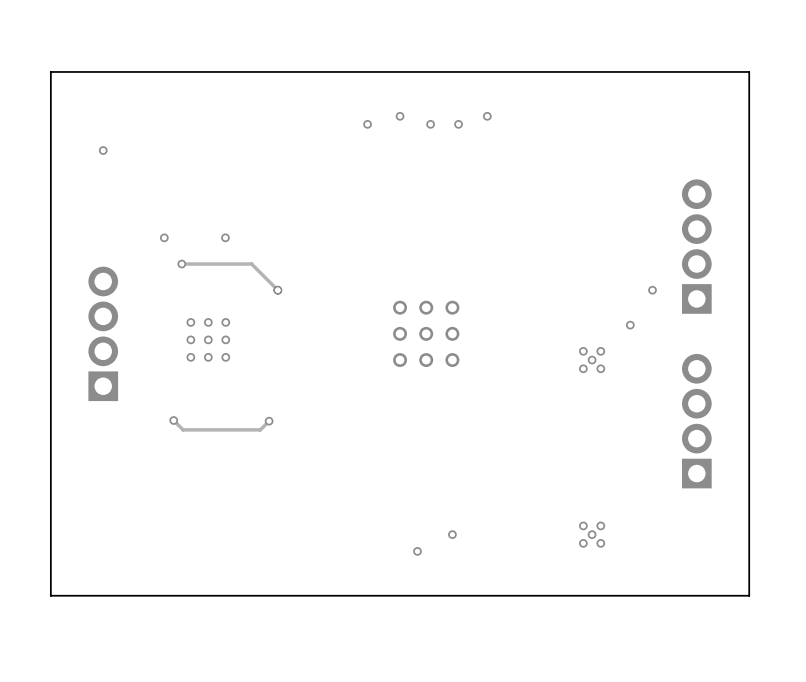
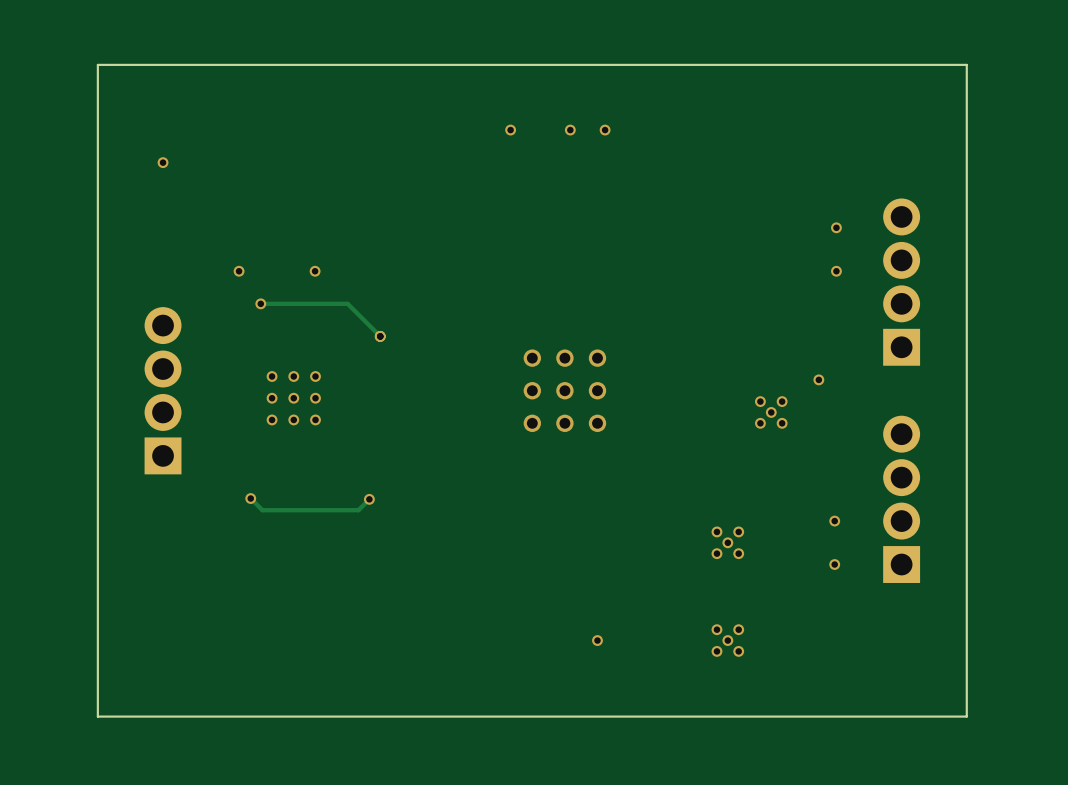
via: (400, 116) -> none
via: (487, 116) -> none
via: (367, 124) -> none
via: none -> (510, 130)
via: none -> (836, 227)
via: none -> (836, 271)
via: (652, 290) -> none
via: none -> (760, 401)
via: none -> (782, 401)
via: (583, 351) -> none
via: none -> (771, 412)
via: (600, 351) -> none
via: none -> (760, 423)
via: (592, 360) -> none
via: none -> (782, 423)
via: (583, 368) -> none
via: (600, 368) -> none
via: none -> (834, 521)
via: none -> (716, 531)
via: none -> (738, 531)
via: none -> (727, 542)
via: none -> (716, 553)
via: none -> (738, 553)
via: none -> (834, 564)
via: none -> (716, 629)
via: none -> (738, 629)
via: (583, 525) -> none
via: (600, 525) -> none
via: none -> (727, 640)
via: (592, 534) -> none
via: none -> (716, 651)
via: none -> (738, 651)
via: (583, 543) -> none
via: (600, 543) -> none
via: (417, 551) -> none

